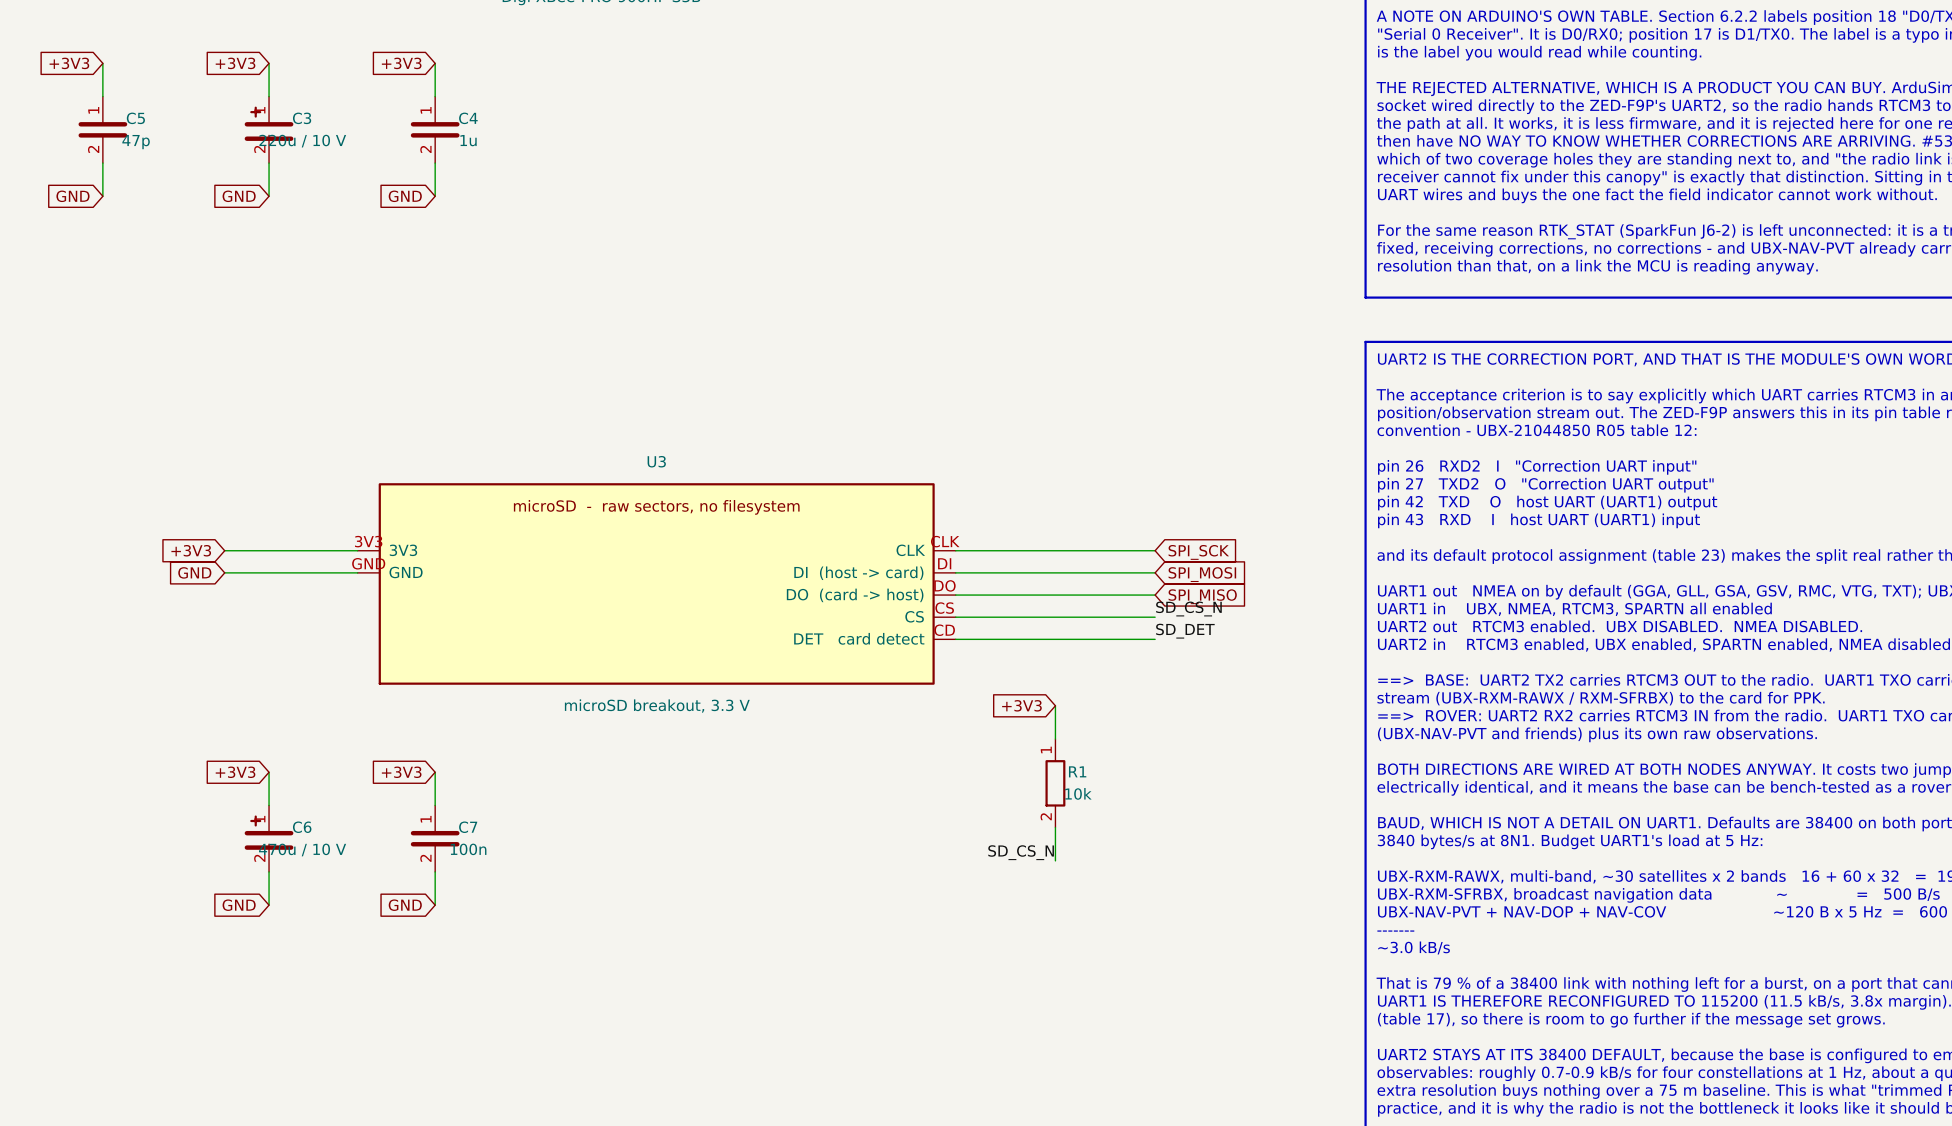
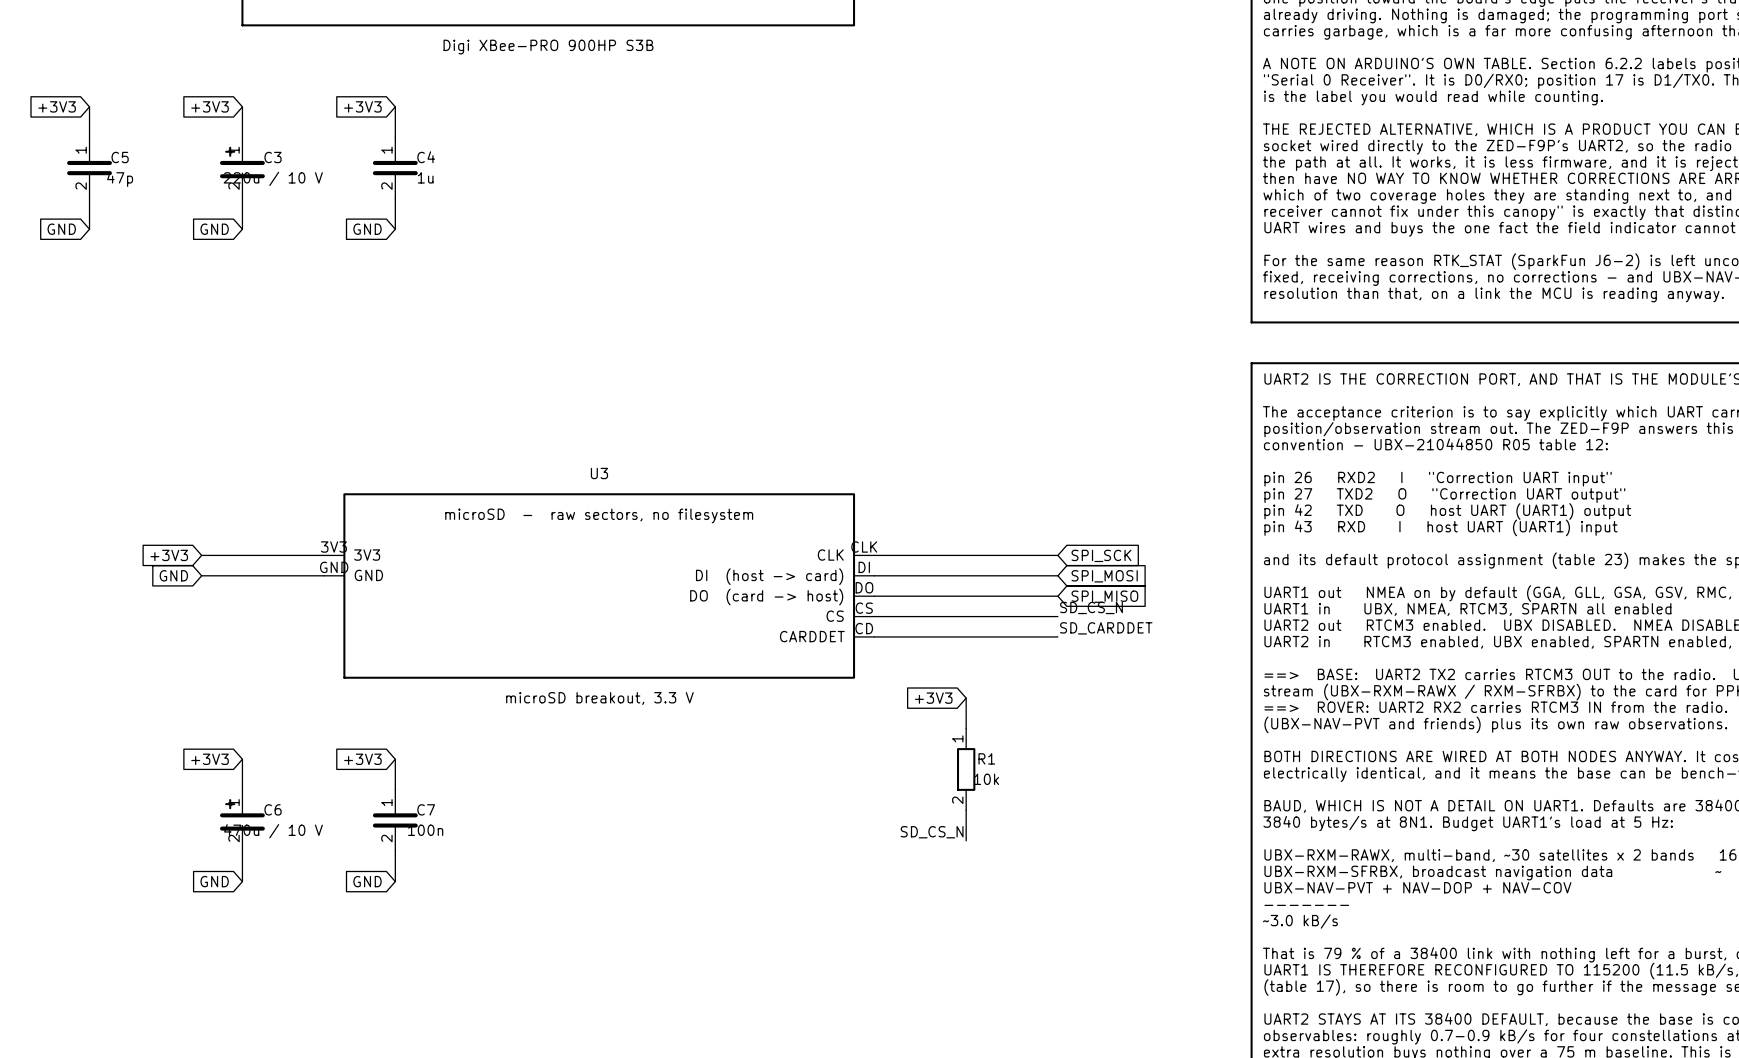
label: SD_DET (1185, 631) -> SD_CARDDET (1106, 628)
U3 pin name: DET card detect (859, 638) -> CARDDET (812, 636)

